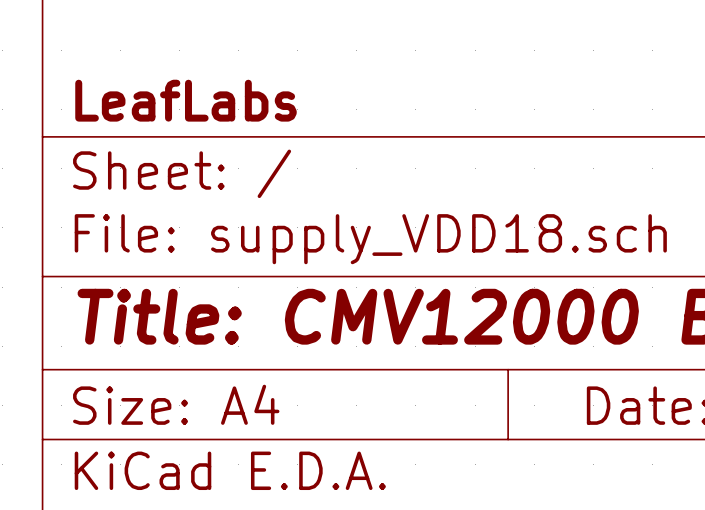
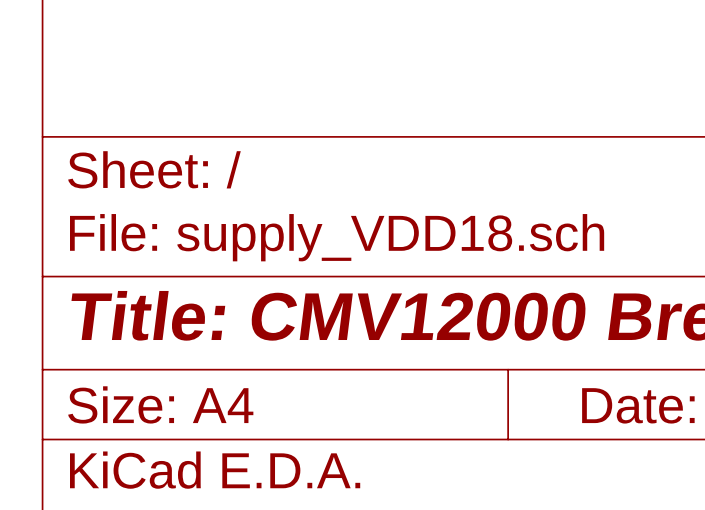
title block: LeafLabs (185, 100) -> none

